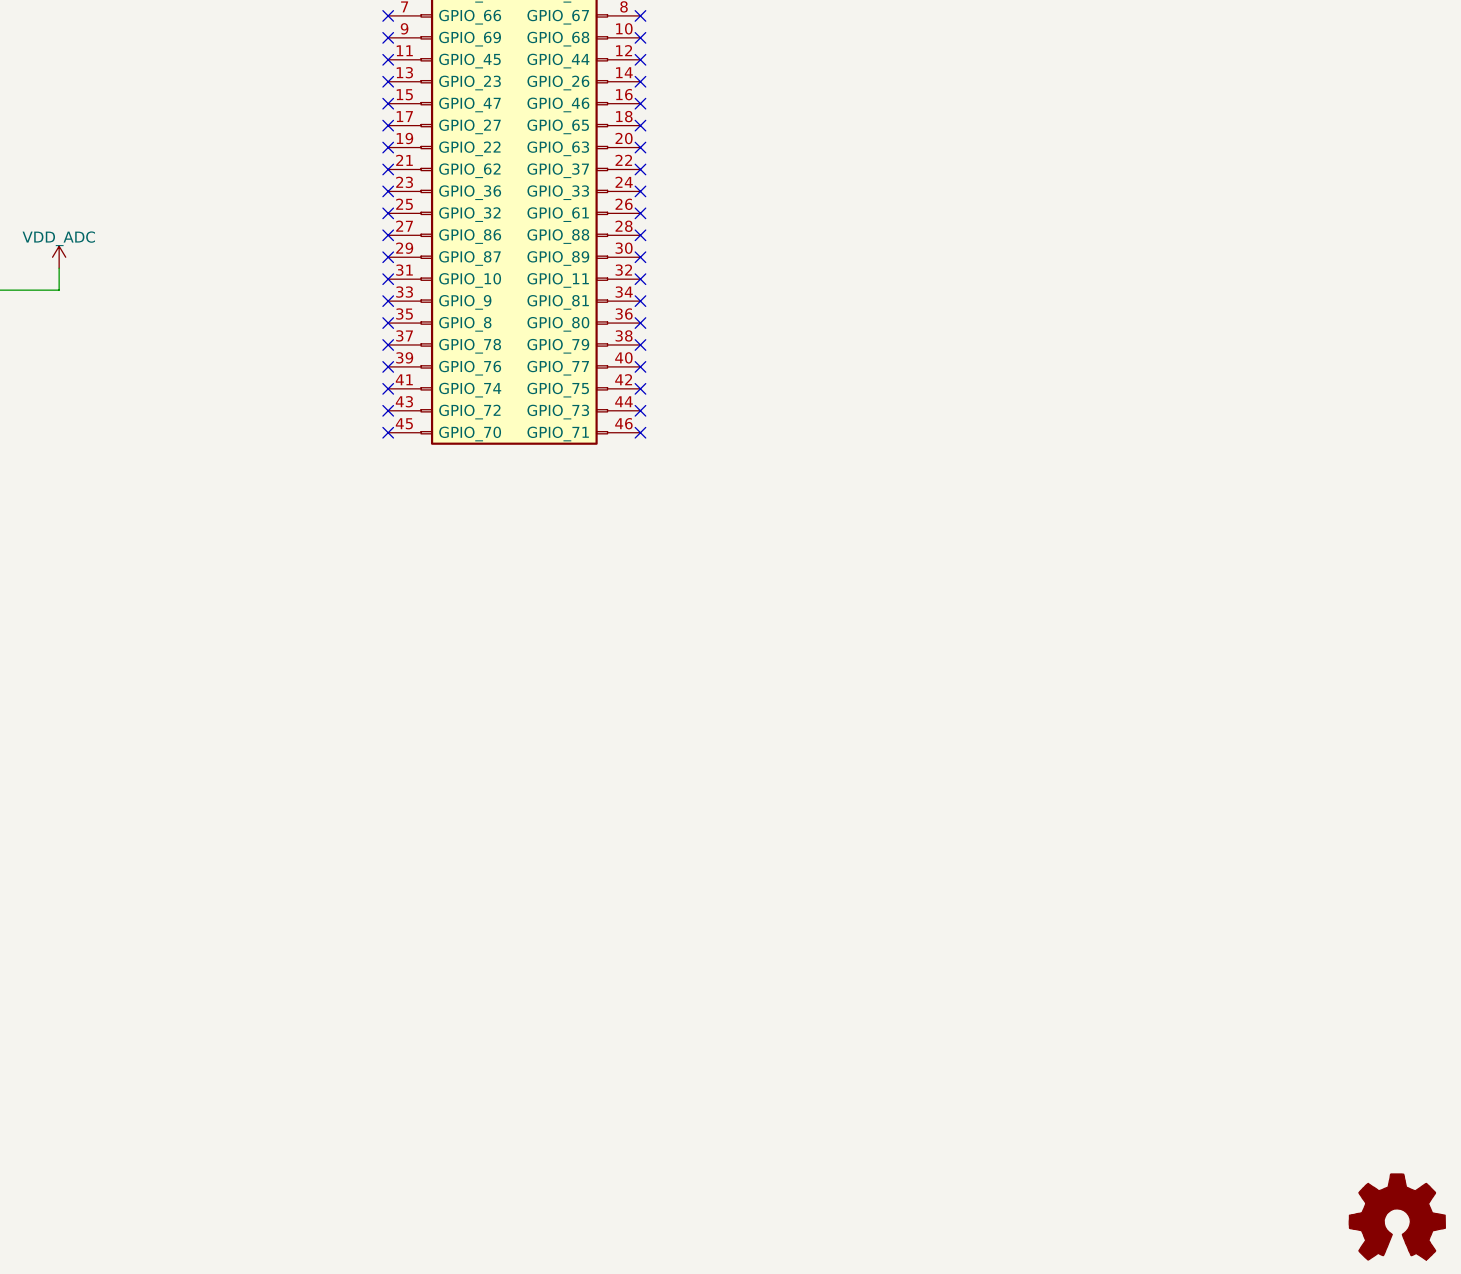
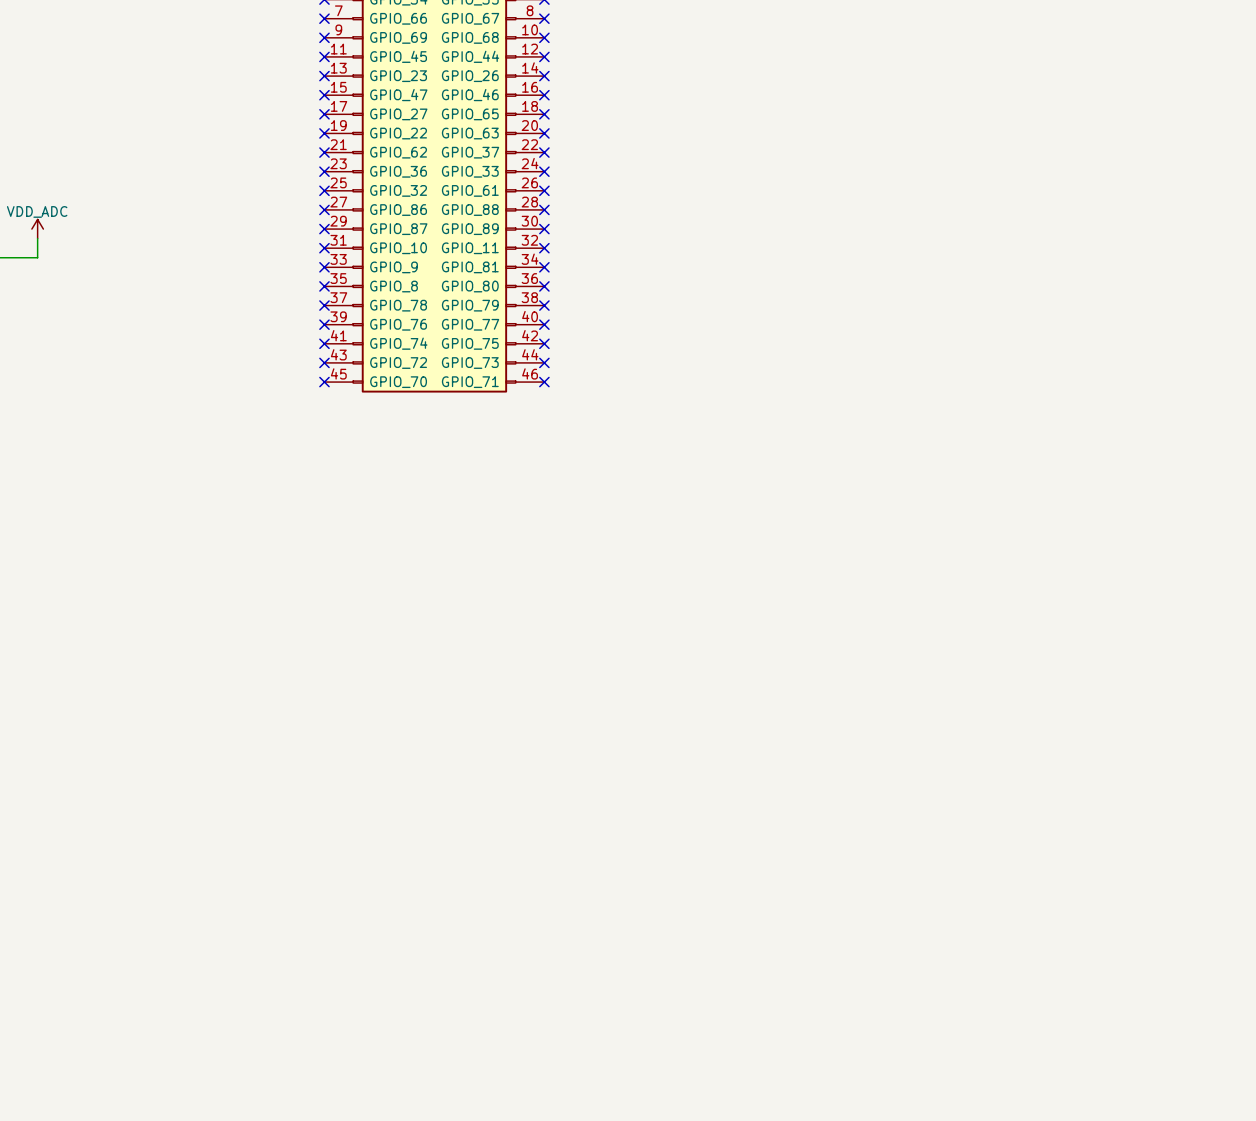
power symbol: (1397, 1216) -> none

